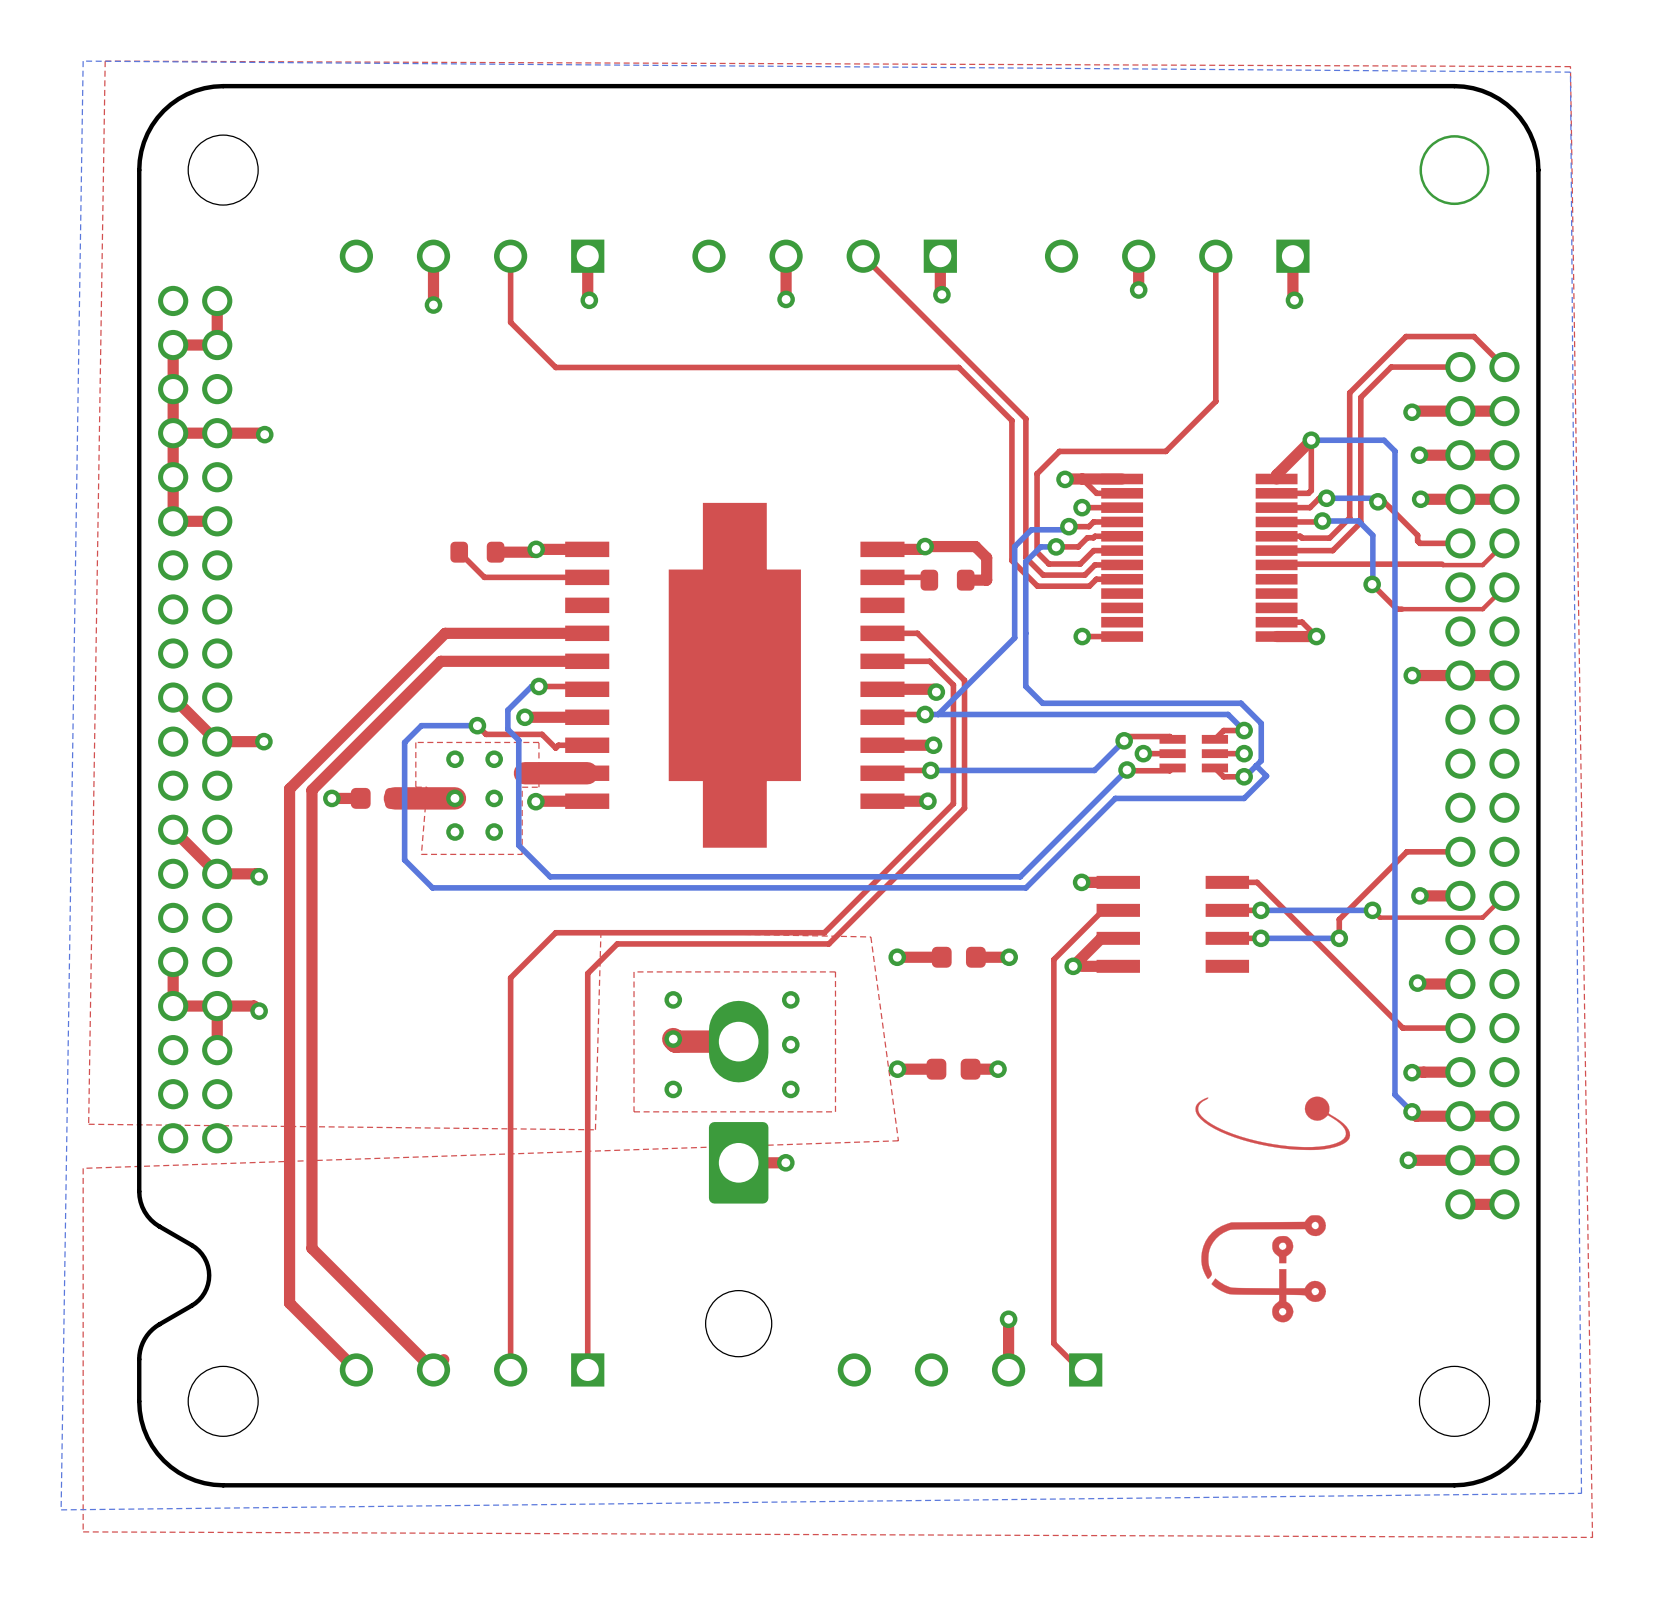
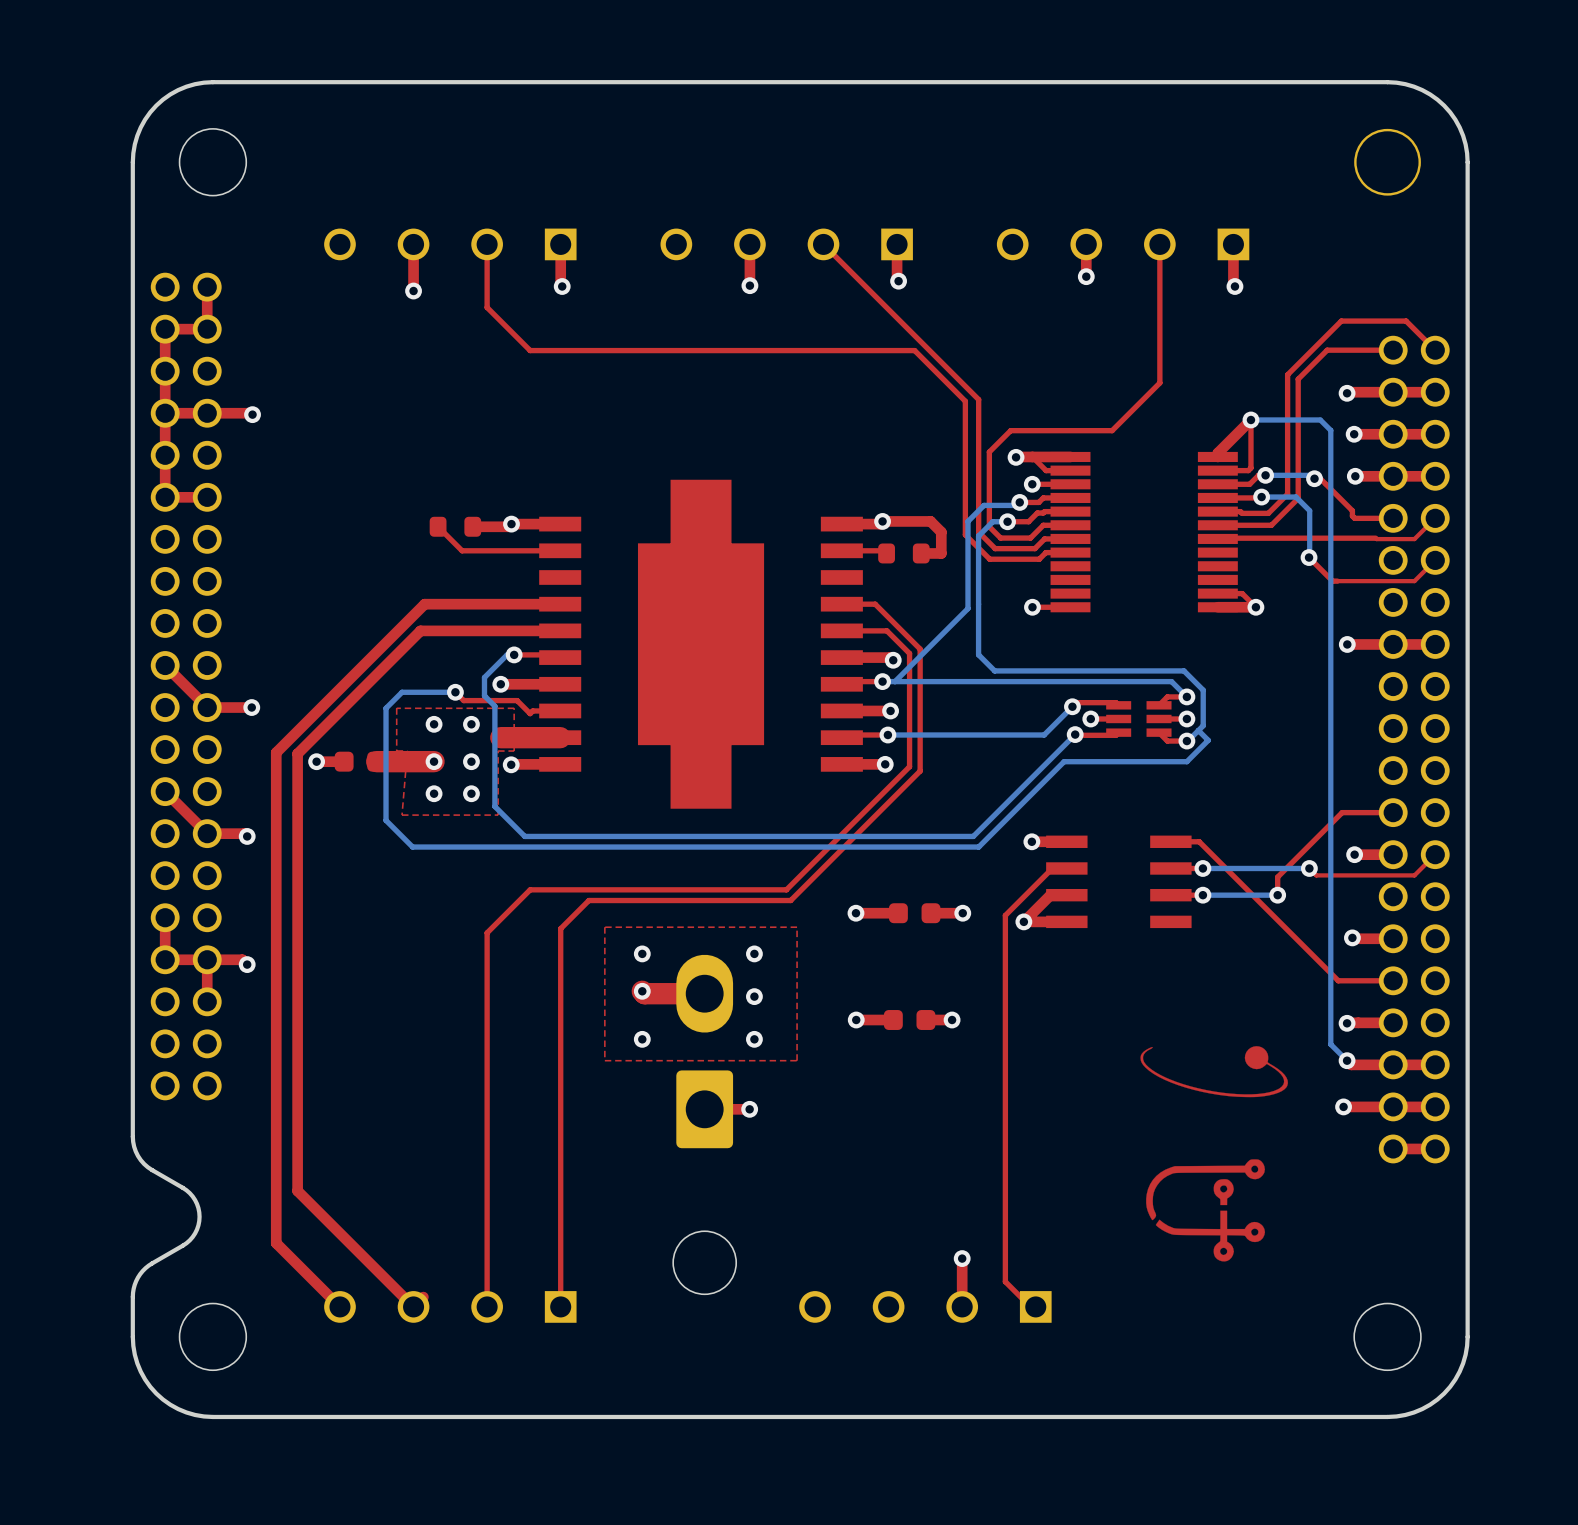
bottom zone outline: (83, 61) (1570, 72) (1581, 1493) (61, 1509) (83, 61) -> none
top zone outline: (105, 61) (1570, 66) (1592, 1537) (83, 1531) (83, 1168) (898, 1140) (870, 936) (600, 931) (595, 1129) (88, 1124) (105, 61) -> none

